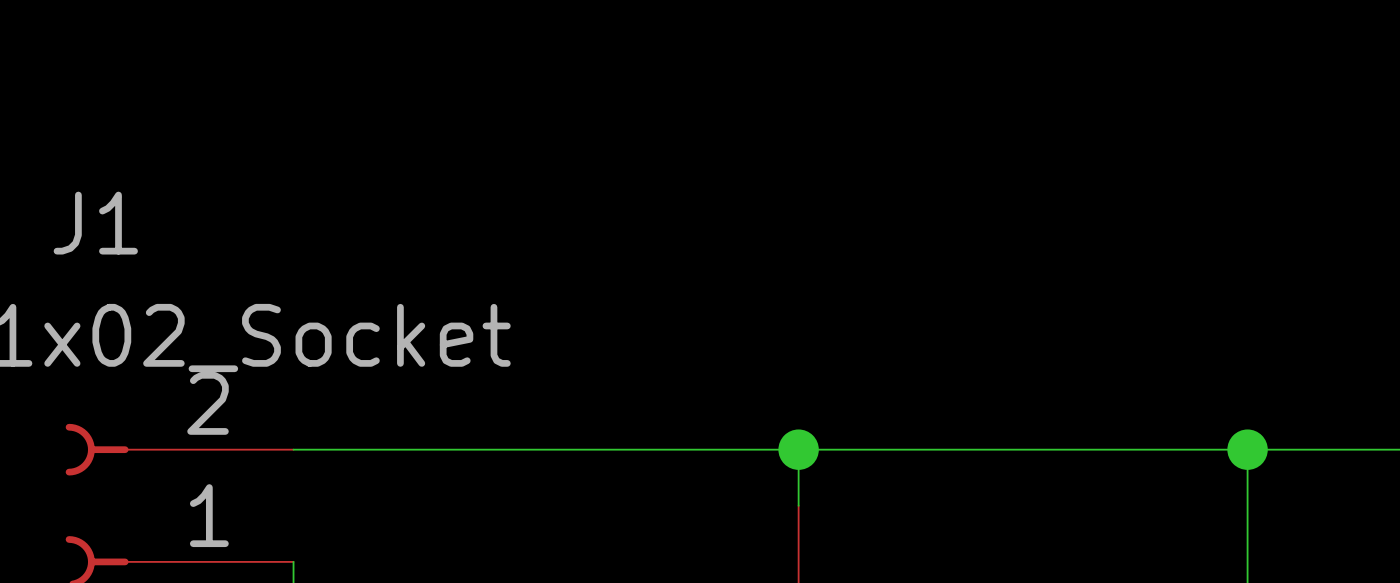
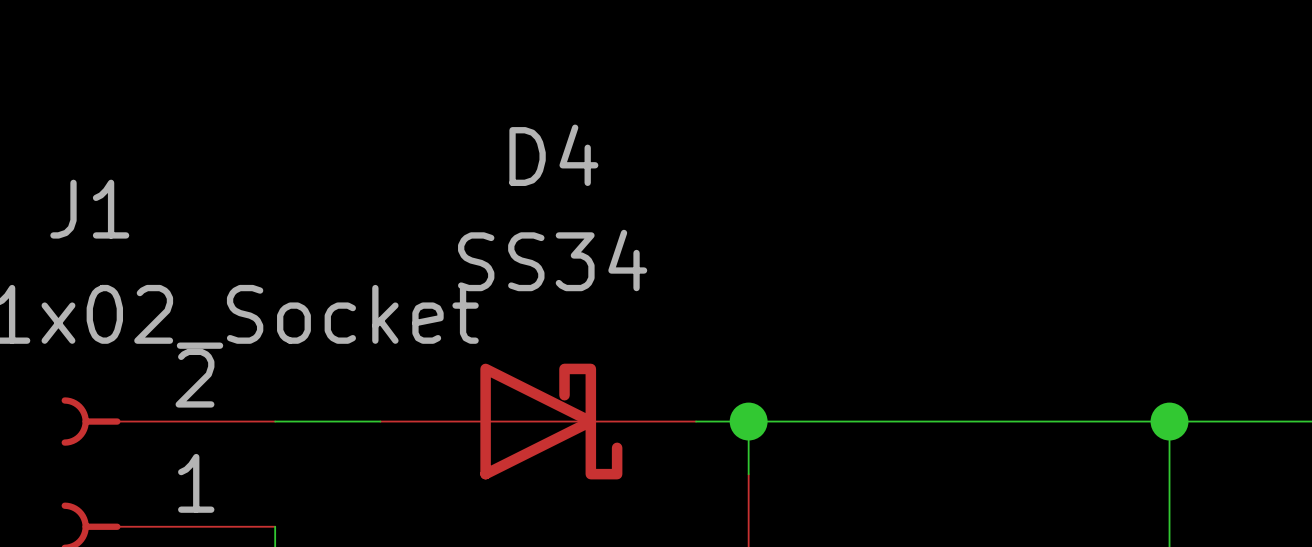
D4: none -> SS34 (538, 421)

